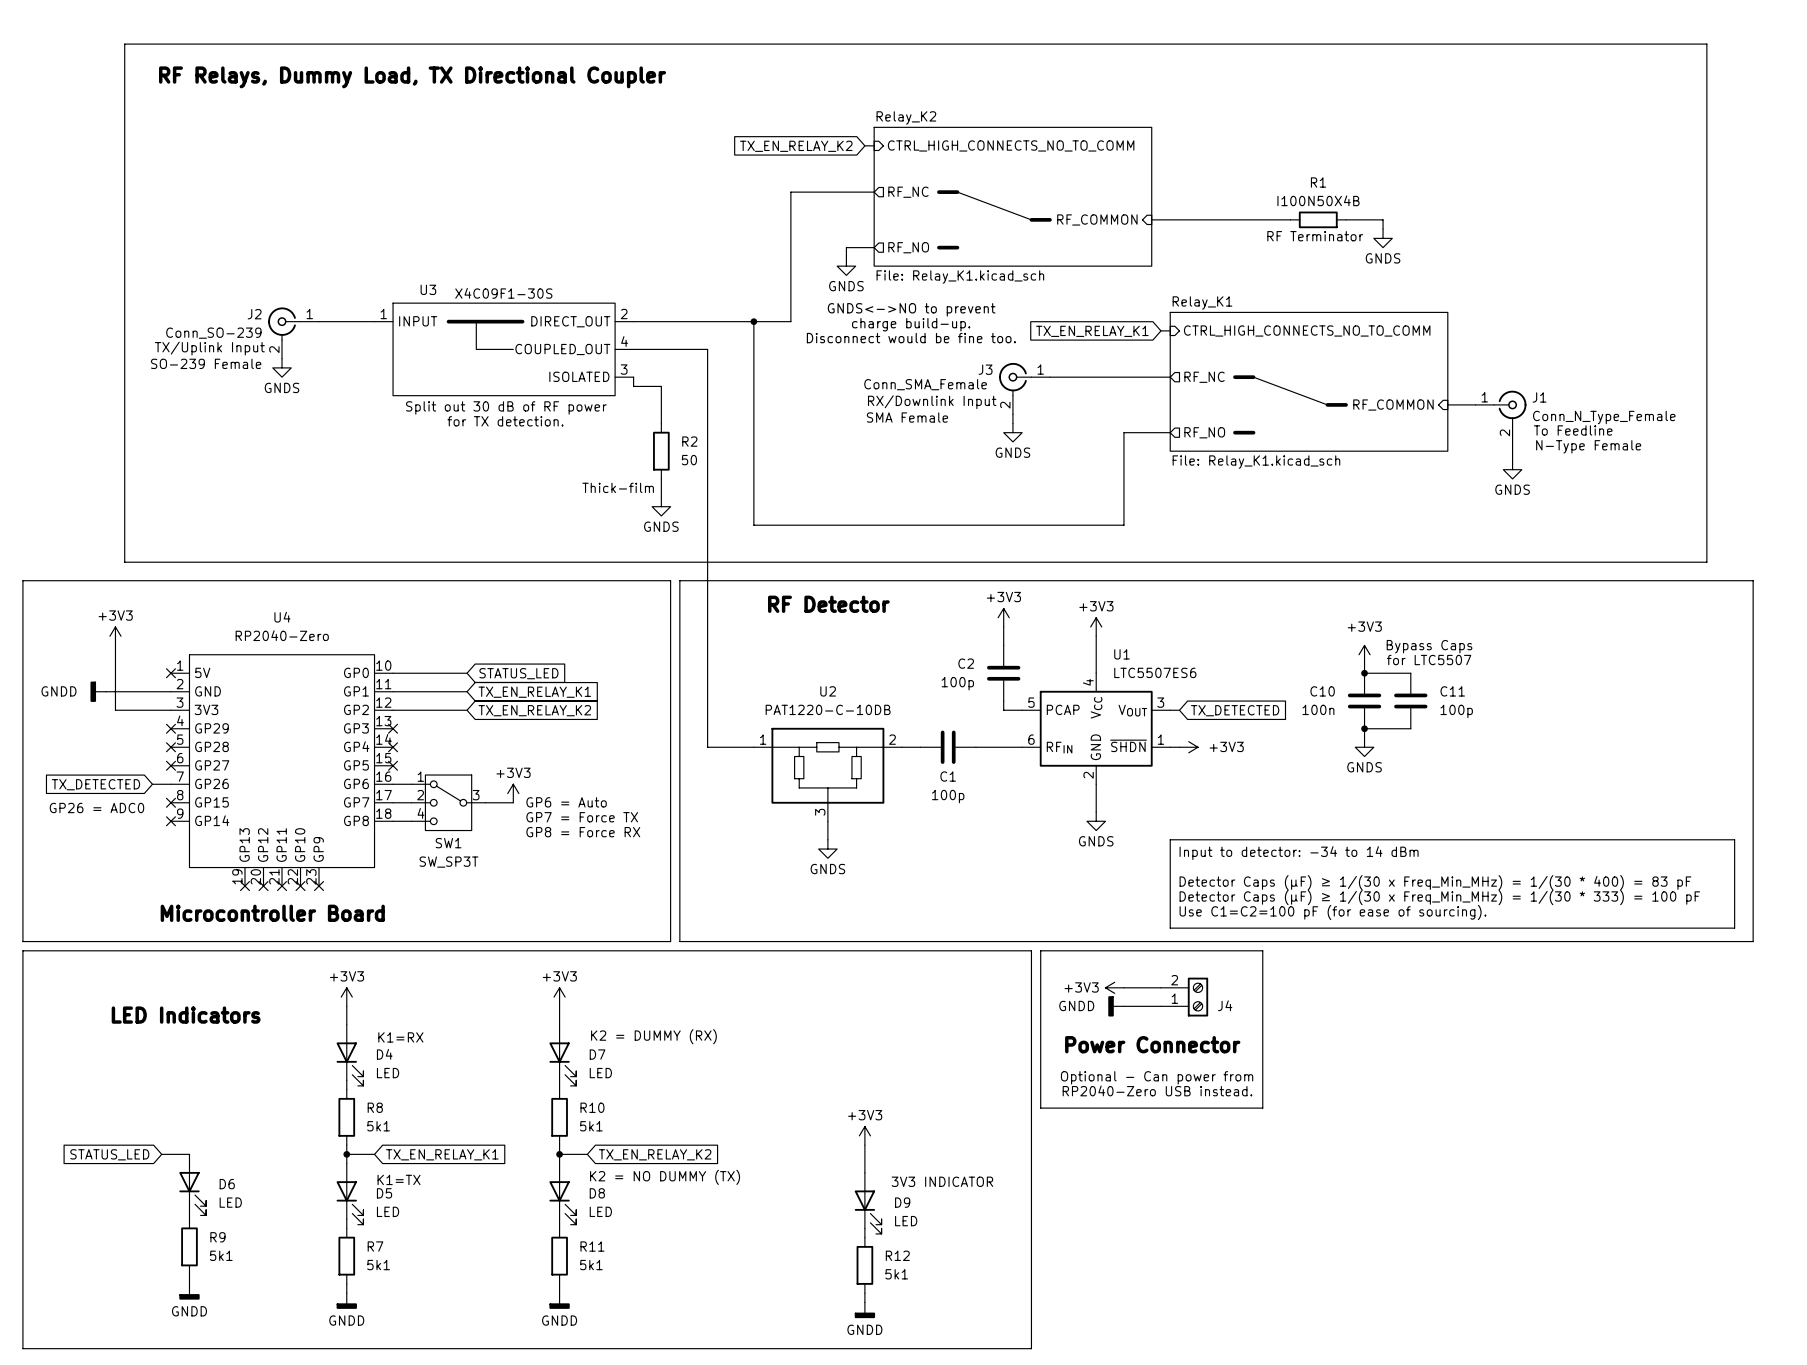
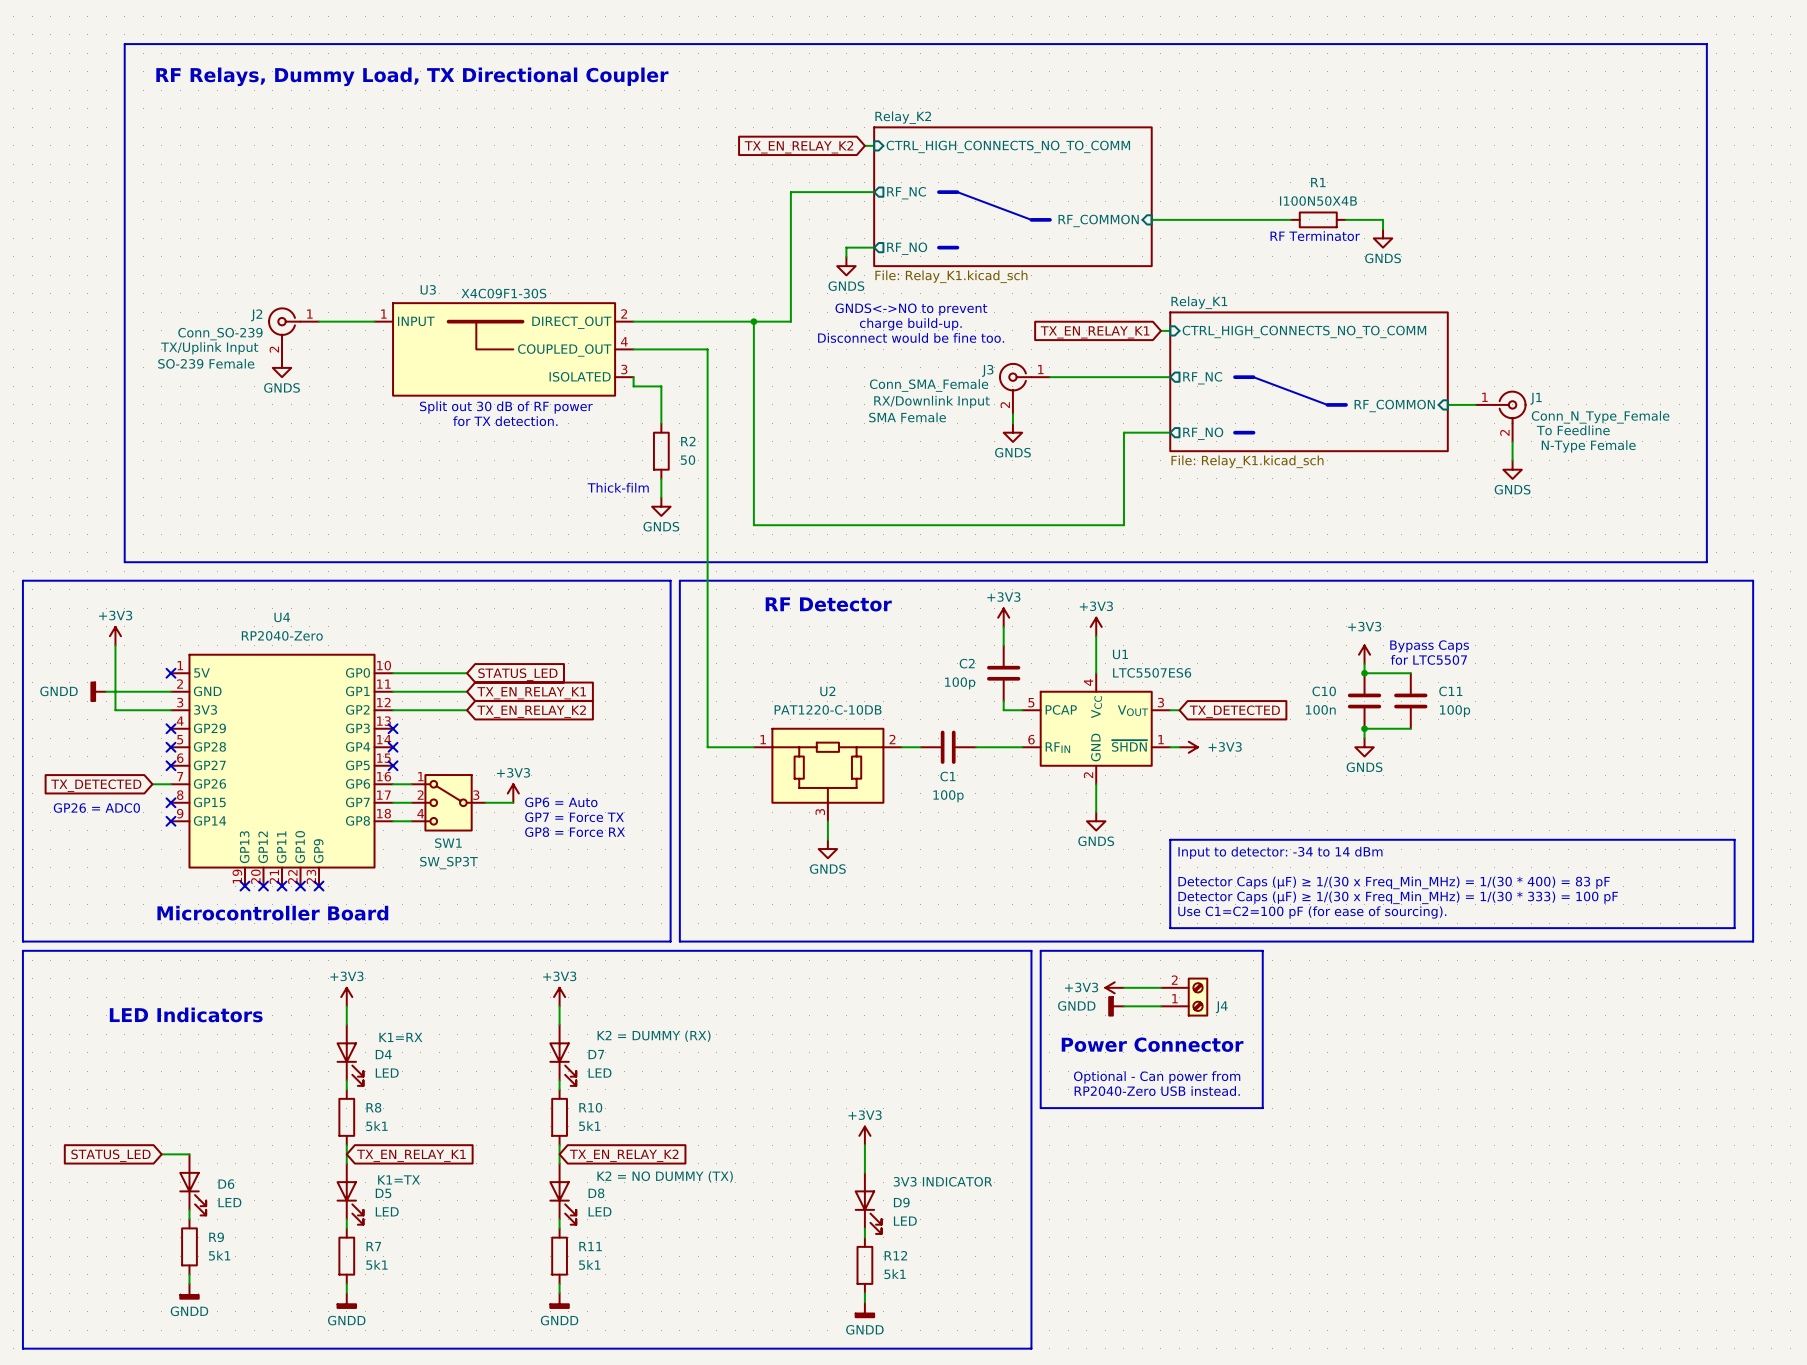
wire: (346, 1154) (374, 1154) -> none
junction: (346, 1154) -> none
global label position: TX_EN_RELAY_K1 (442, 1154) -> TX_EN_RELAY_K1 (411, 1155)
wire: (559, 1154) (587, 1154) -> none
junction: (559, 1154) -> none
global label position: TX_EN_RELAY_K2 (655, 1154) -> TX_EN_RELAY_K2 (624, 1155)

